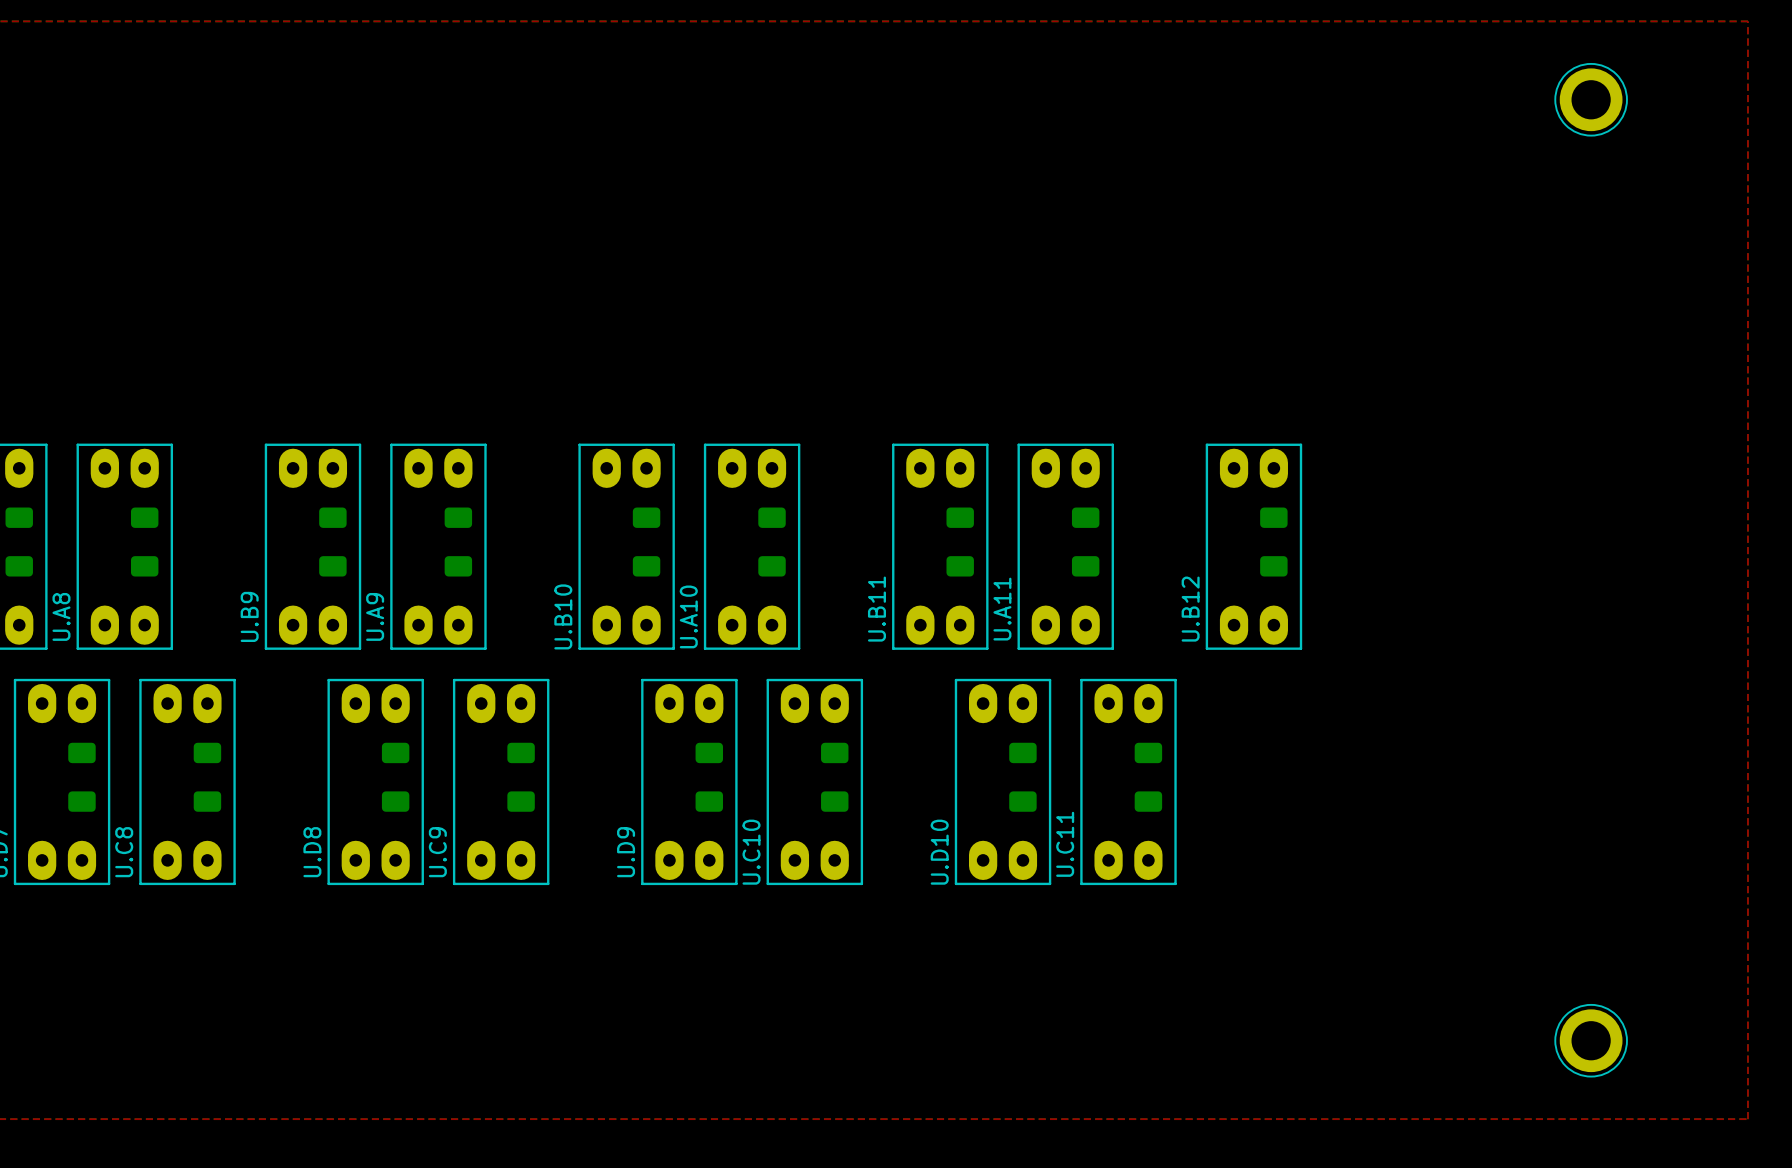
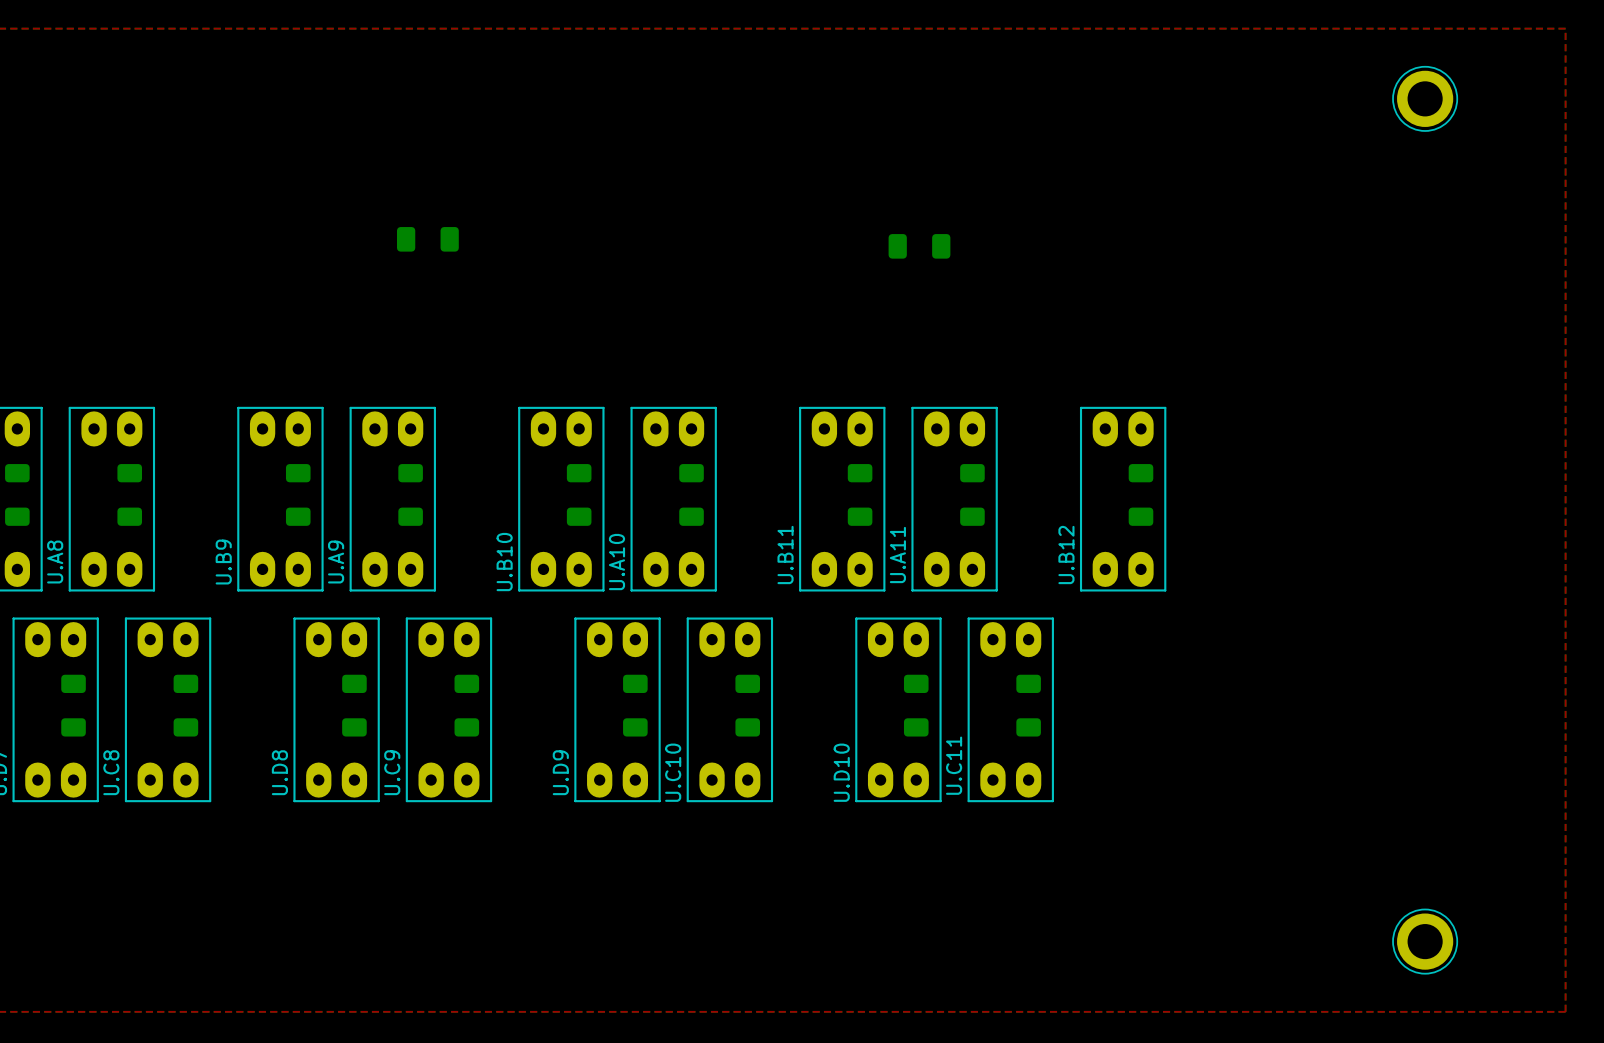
part: none -> (427, 239)
part: none -> (919, 246)

